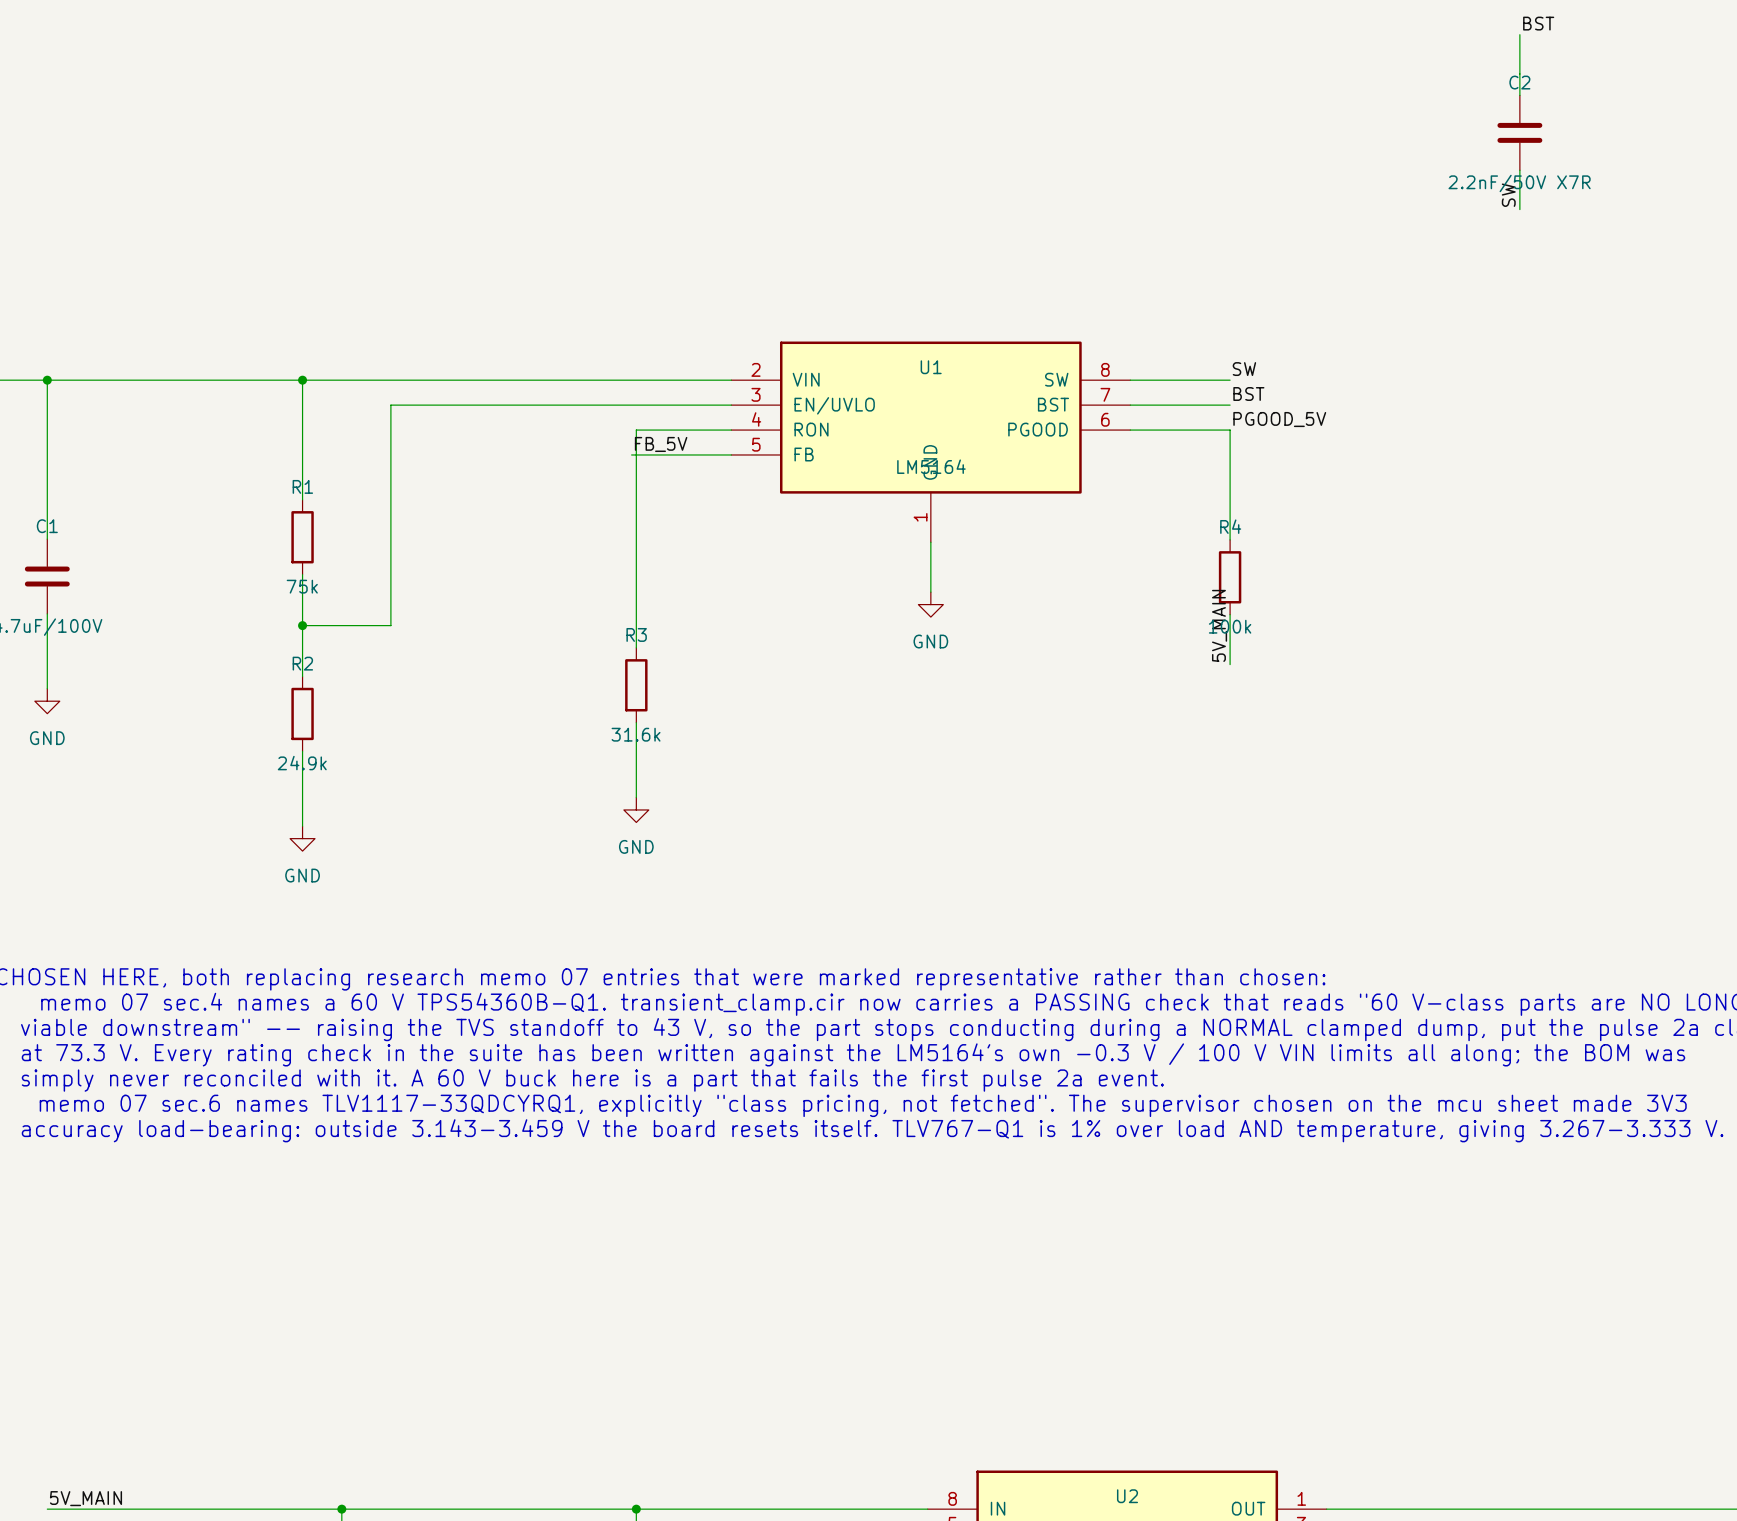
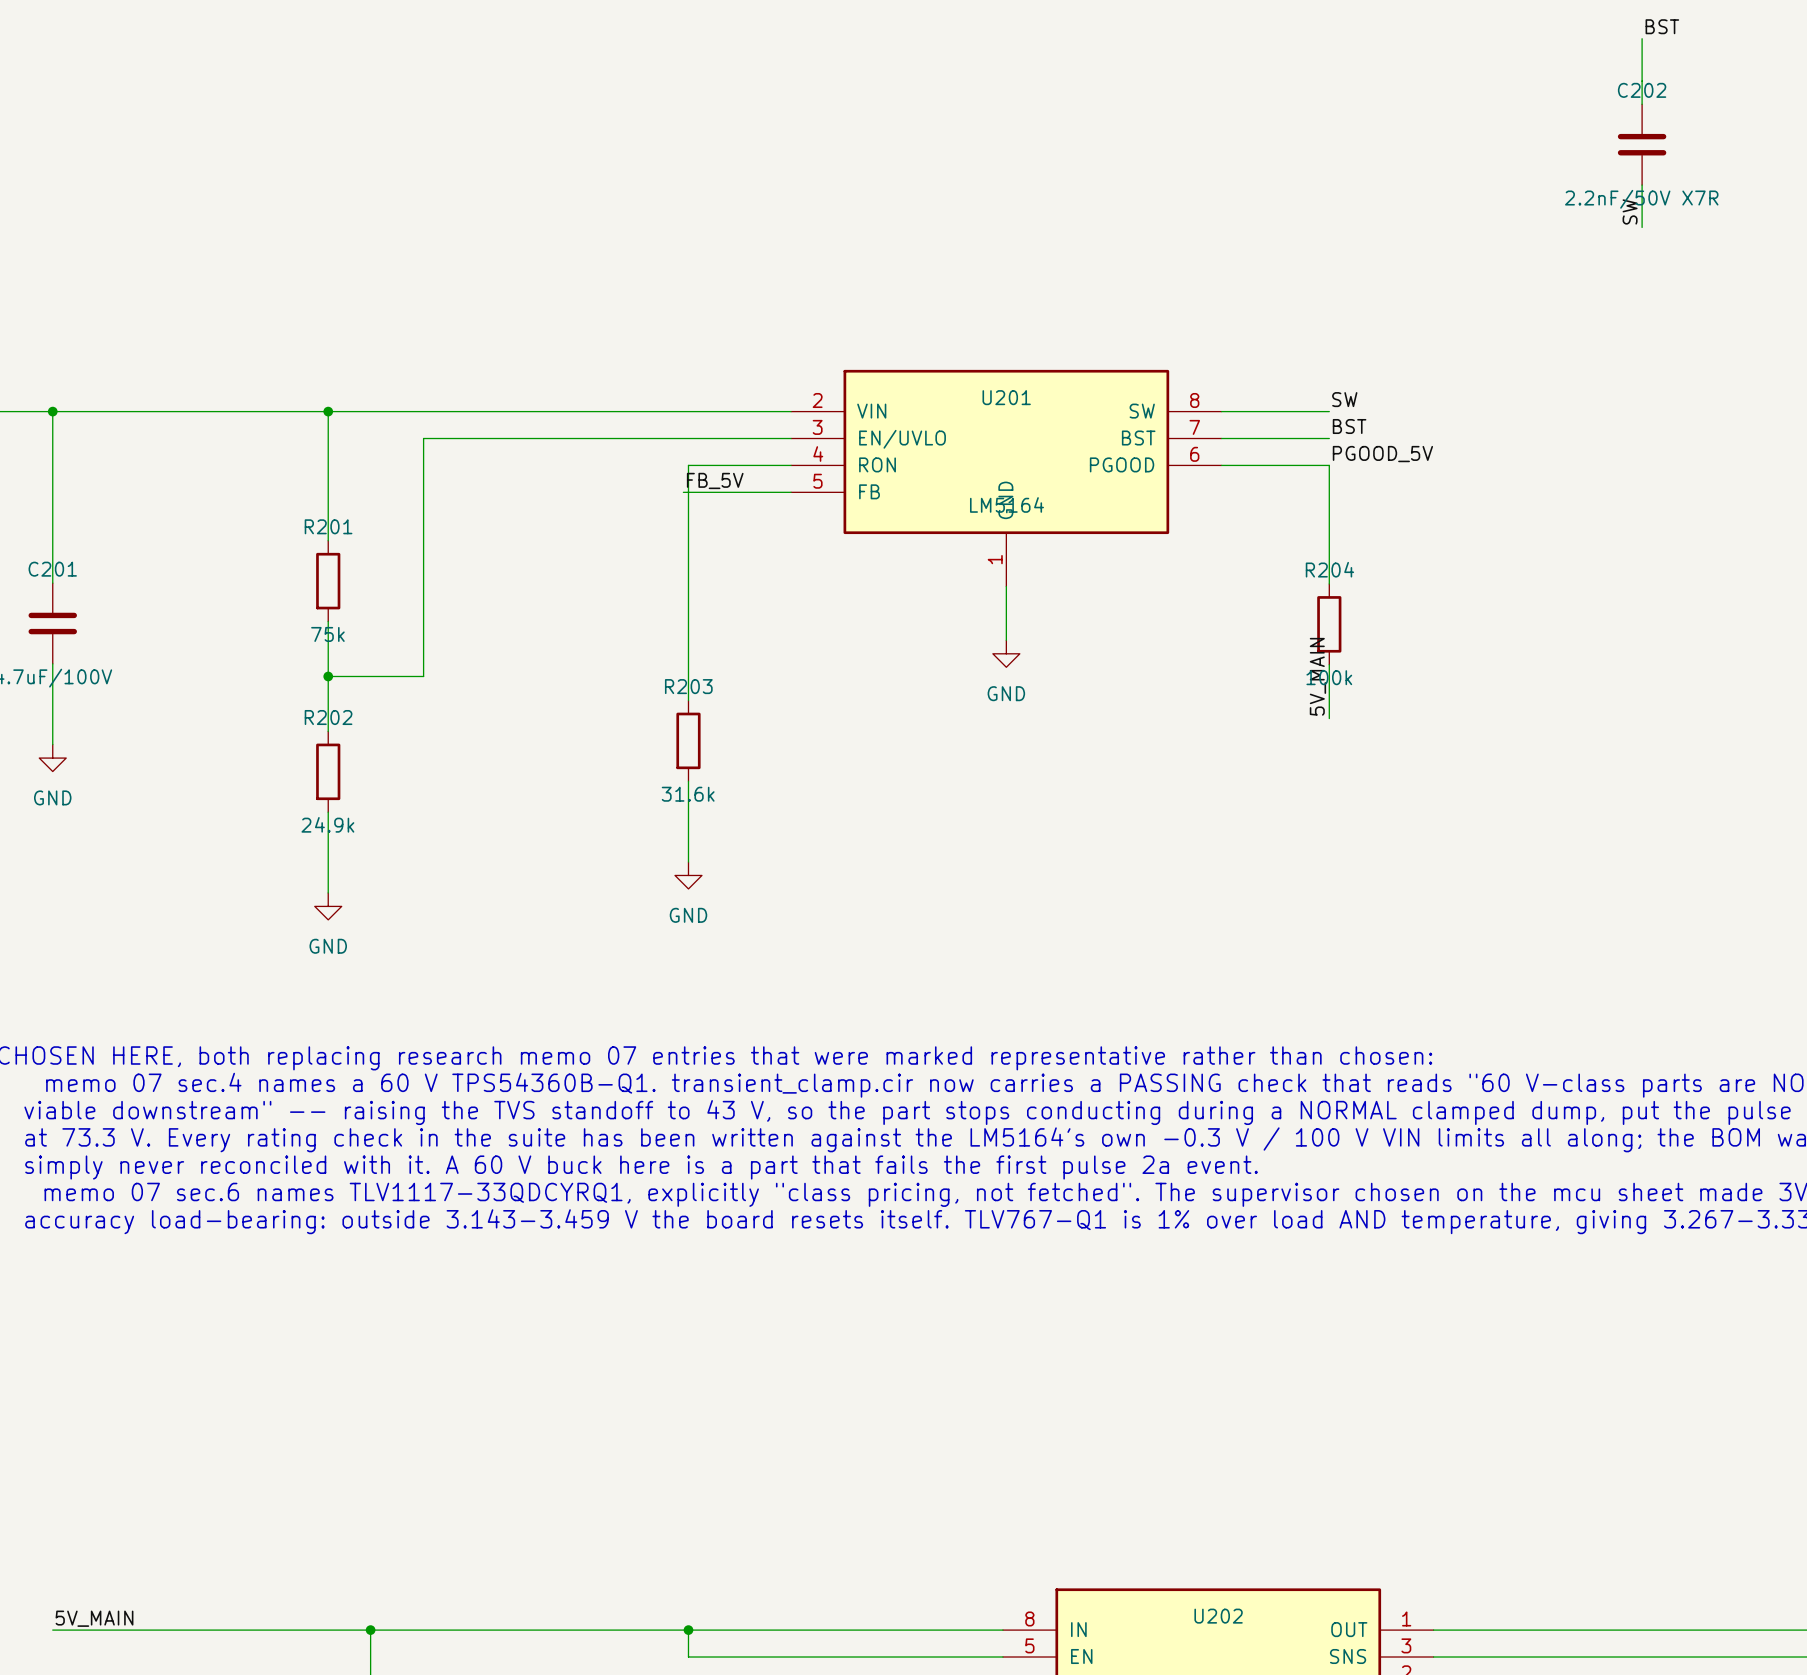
C2 name: C2 (1519, 82) -> C202 (1642, 90)
U1 name: U1 (931, 367) -> U201 (1006, 397)
R1 name: R1 (302, 486) -> R201 (328, 526)
C1 name: C1 (47, 526) -> C201 (52, 569)
R4 name: R4 (1230, 526) -> R204 (1329, 569)
R3 name: R3 (636, 634) -> R203 (688, 686)
R2 name: R2 (302, 663) -> R202 (328, 717)
U2 name: U2 (1127, 1496) -> U202 (1218, 1616)

